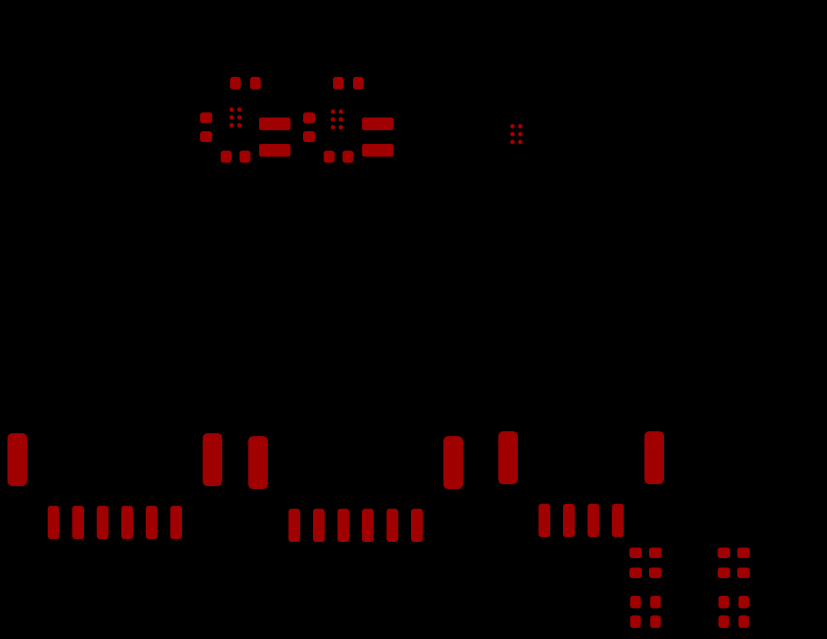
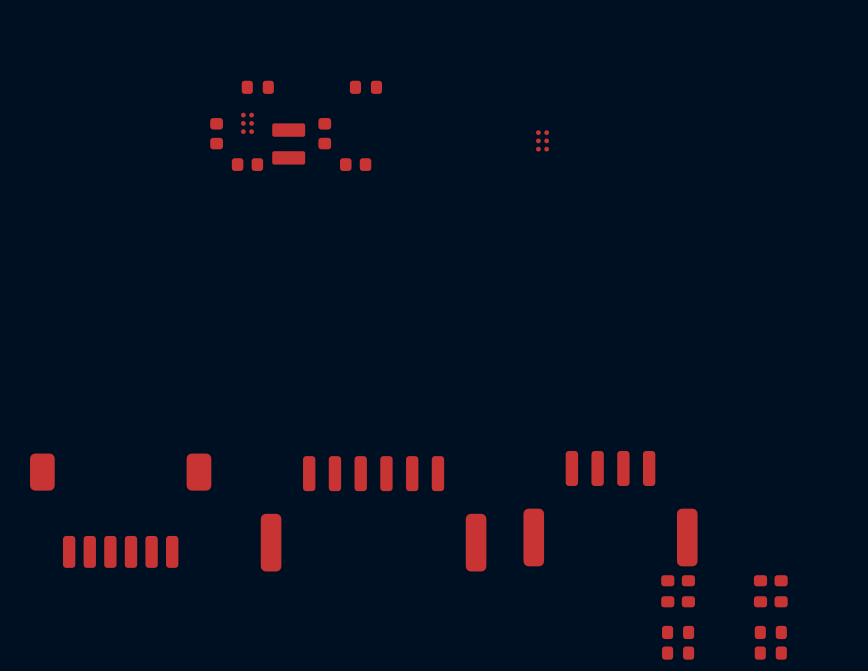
part: (336, 119) -> none
part: (377, 137) -> none
part footprint: [498, 431, 664, 538] -> [523, 450, 698, 567]
part footprint: [7, 433, 223, 540] -> [30, 453, 212, 568]
part footprint: [248, 436, 463, 543] -> [260, 456, 487, 572]

